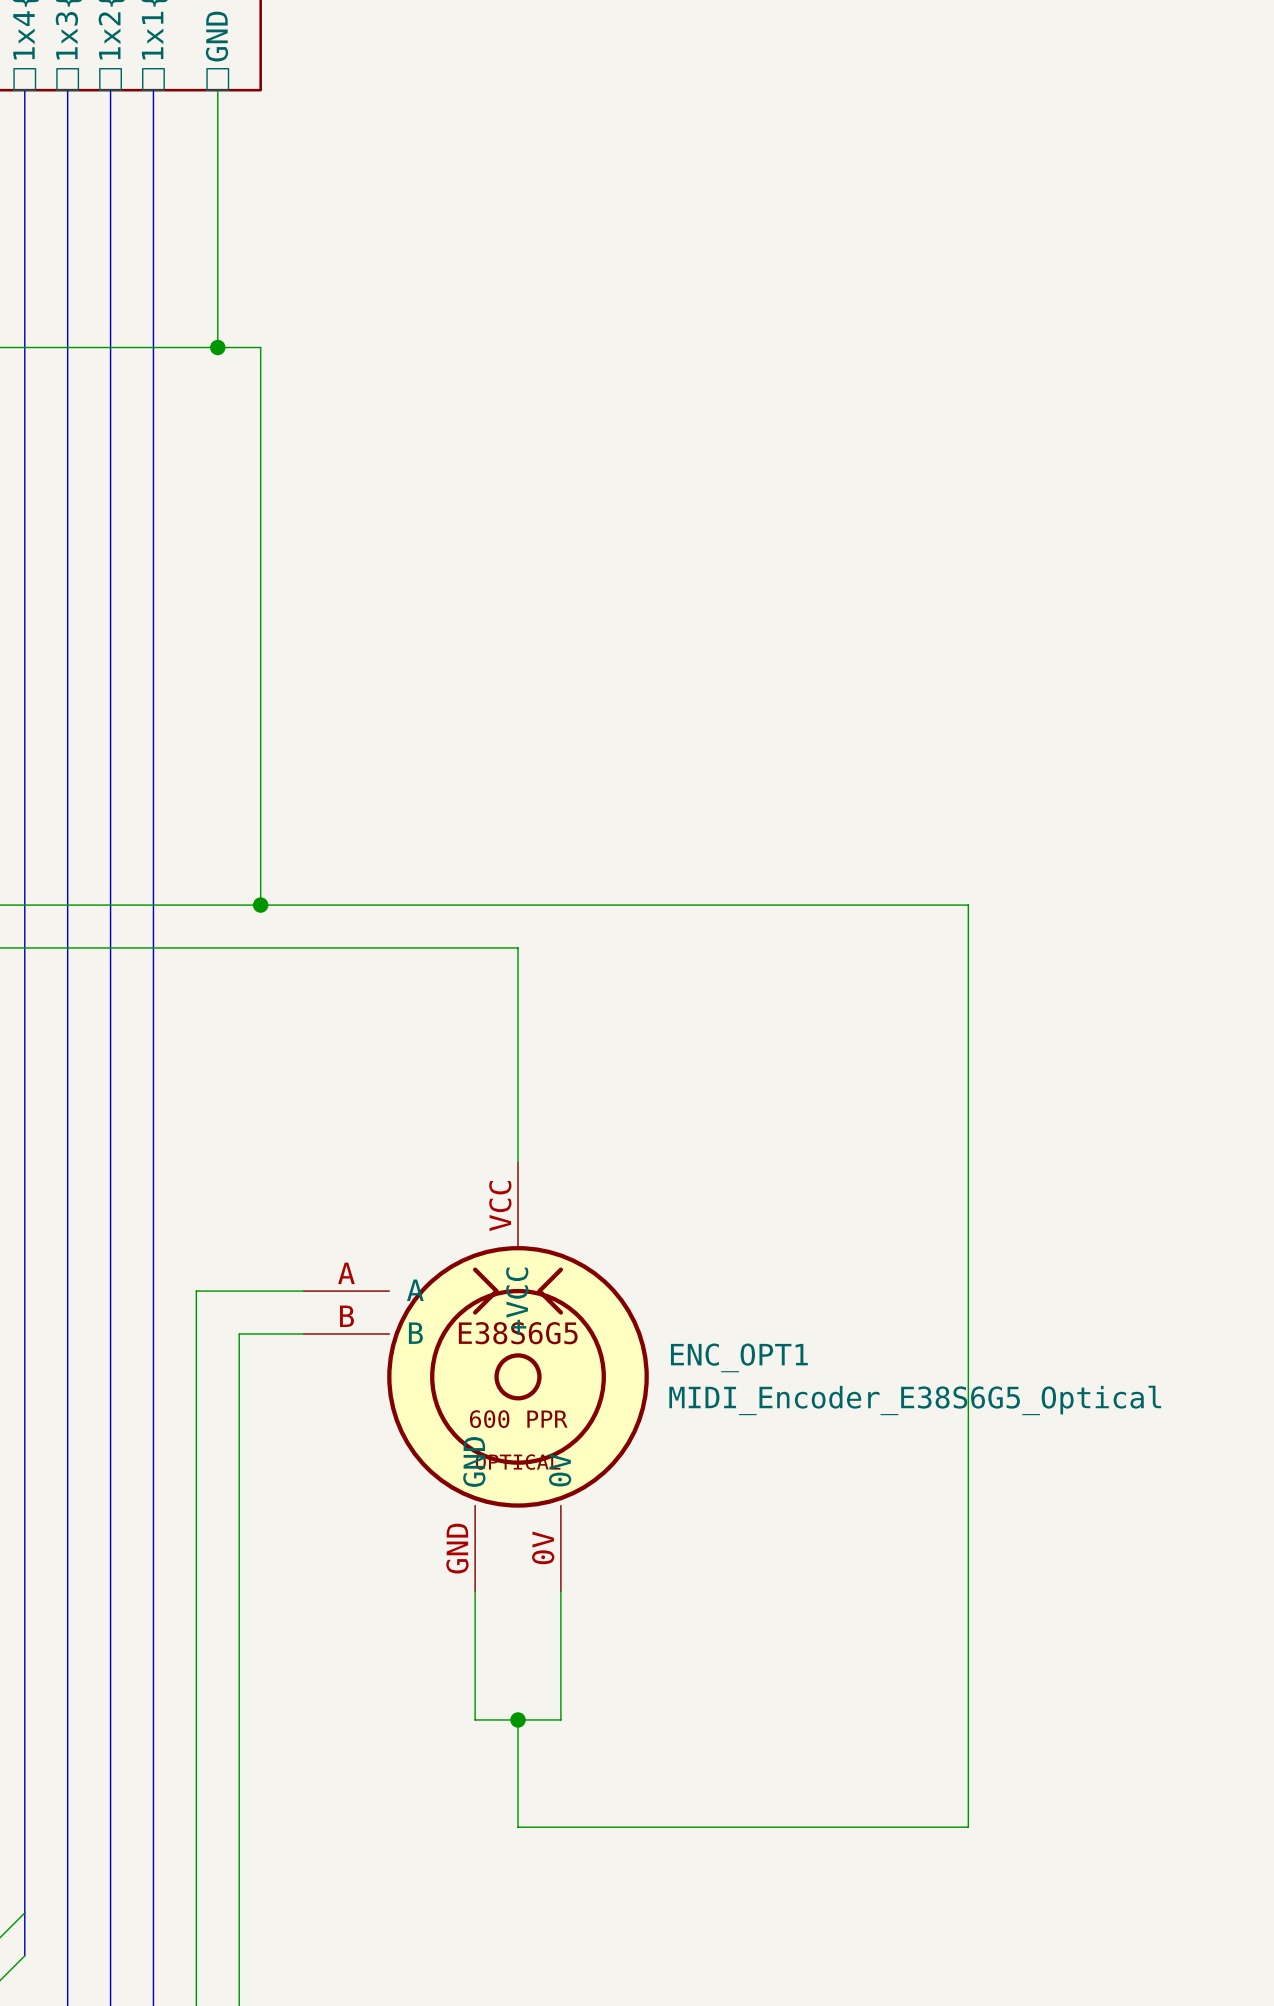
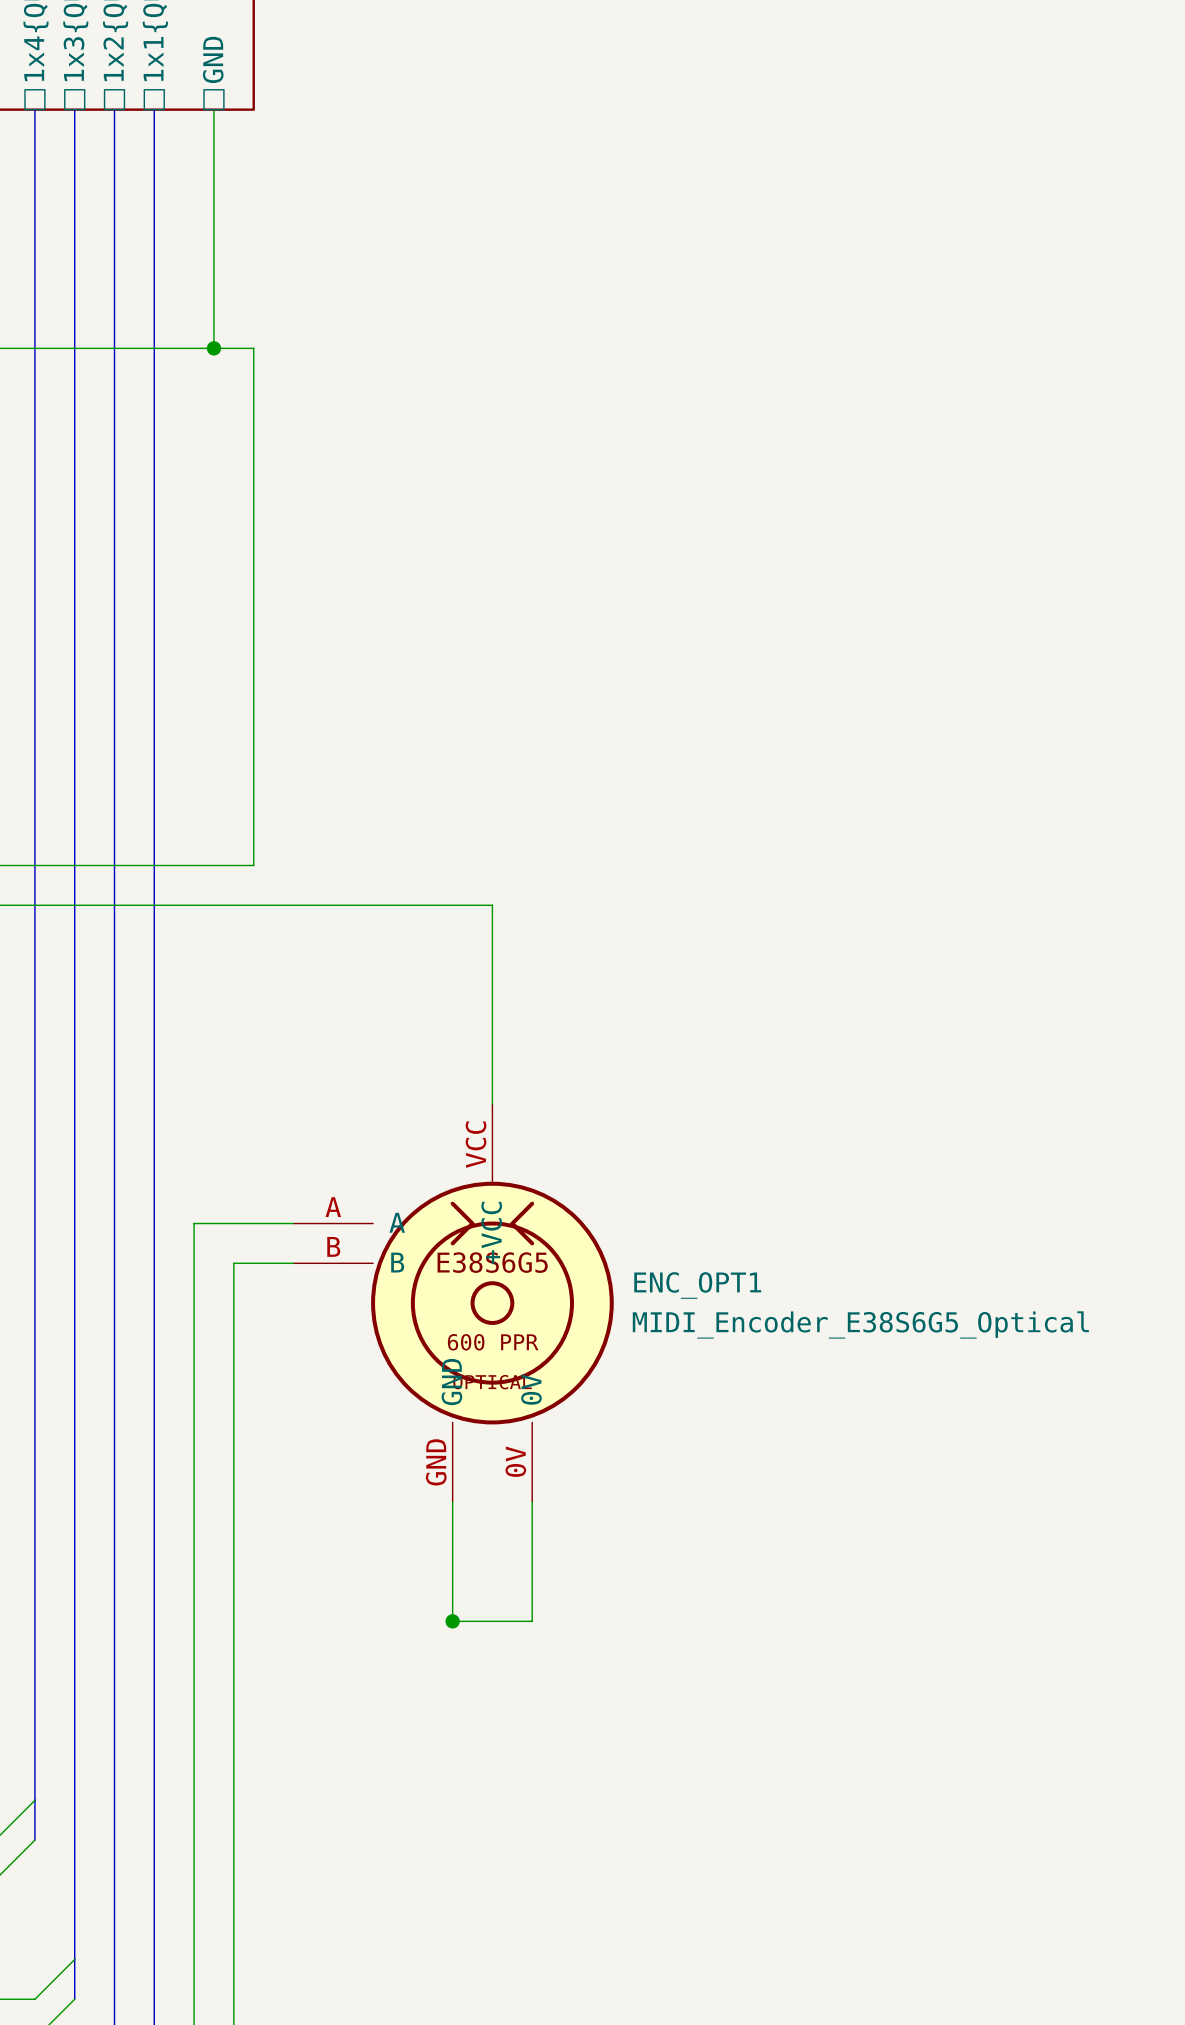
wire: (260, 905) (968, 905) (968, 1827) (518, 1827) (518, 1719) -> none
junction: (260, 905) -> none
junction position: (518, 1719) -> (452, 1621)

